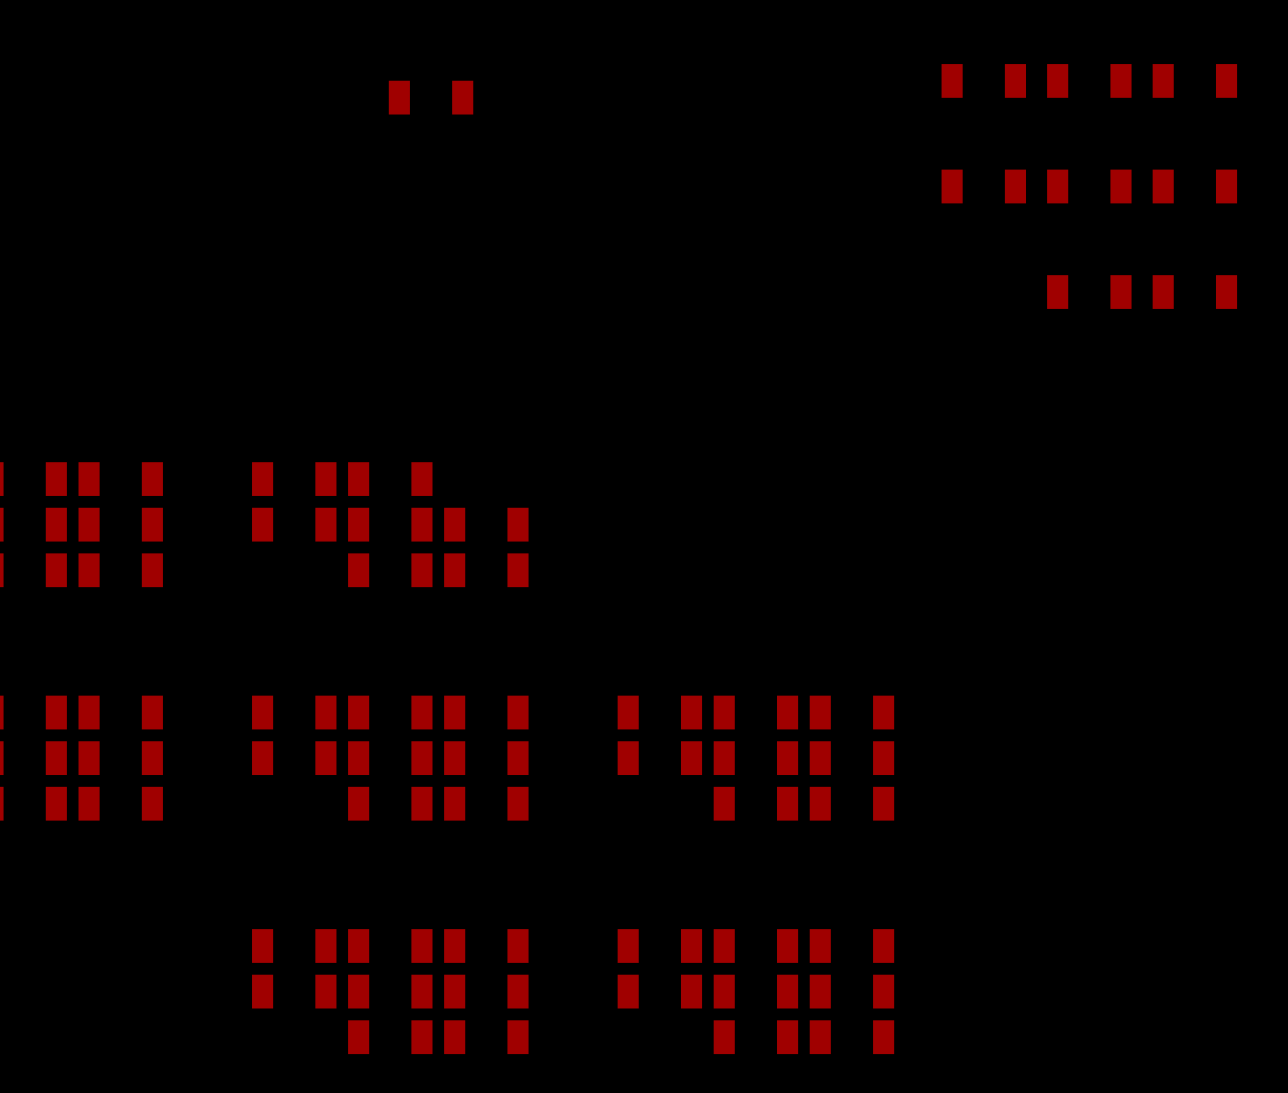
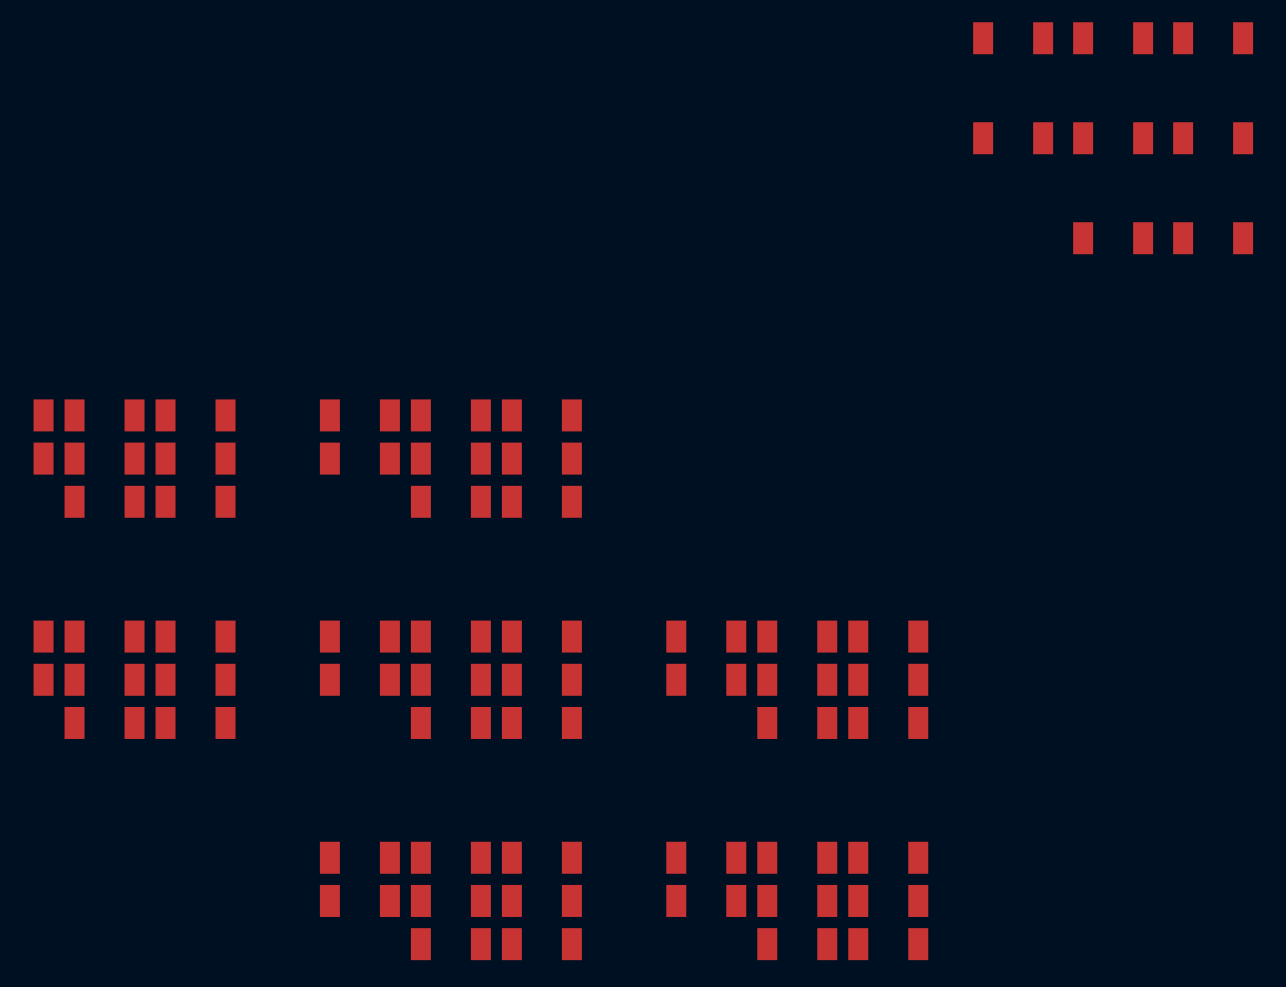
part position: (431, 97) -> (541, 415)

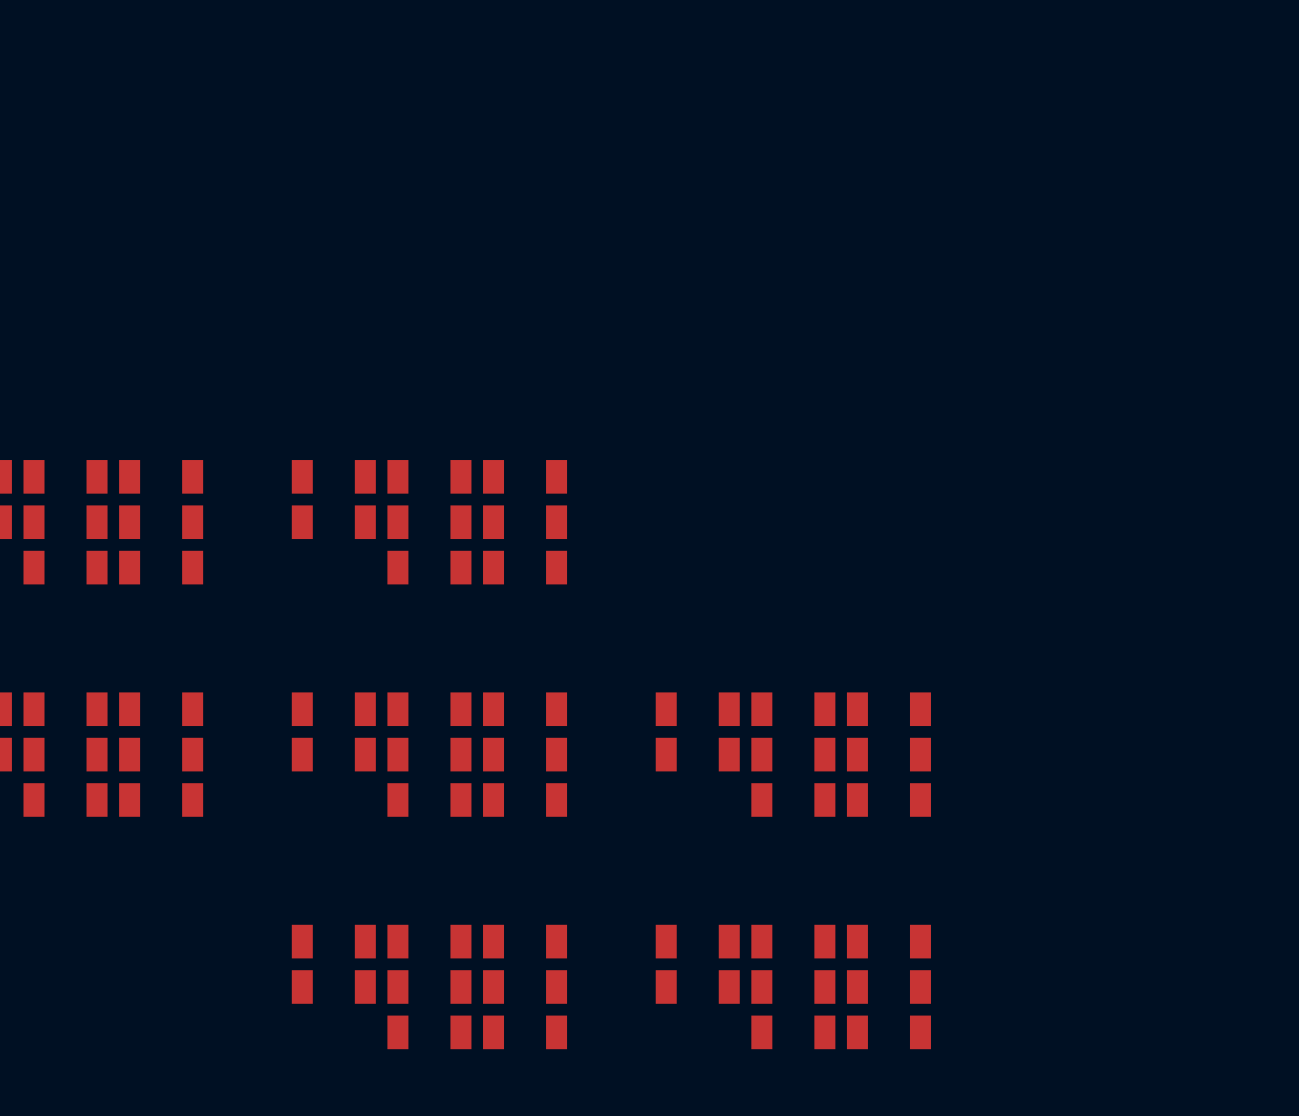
part: (1013, 38) -> none
part: (1113, 38) -> none
part: (1213, 38) -> none
part: (1013, 138) -> none
part: (1113, 138) -> none
part: (1213, 138) -> none
part: (1113, 238) -> none
part: (1213, 238) -> none

